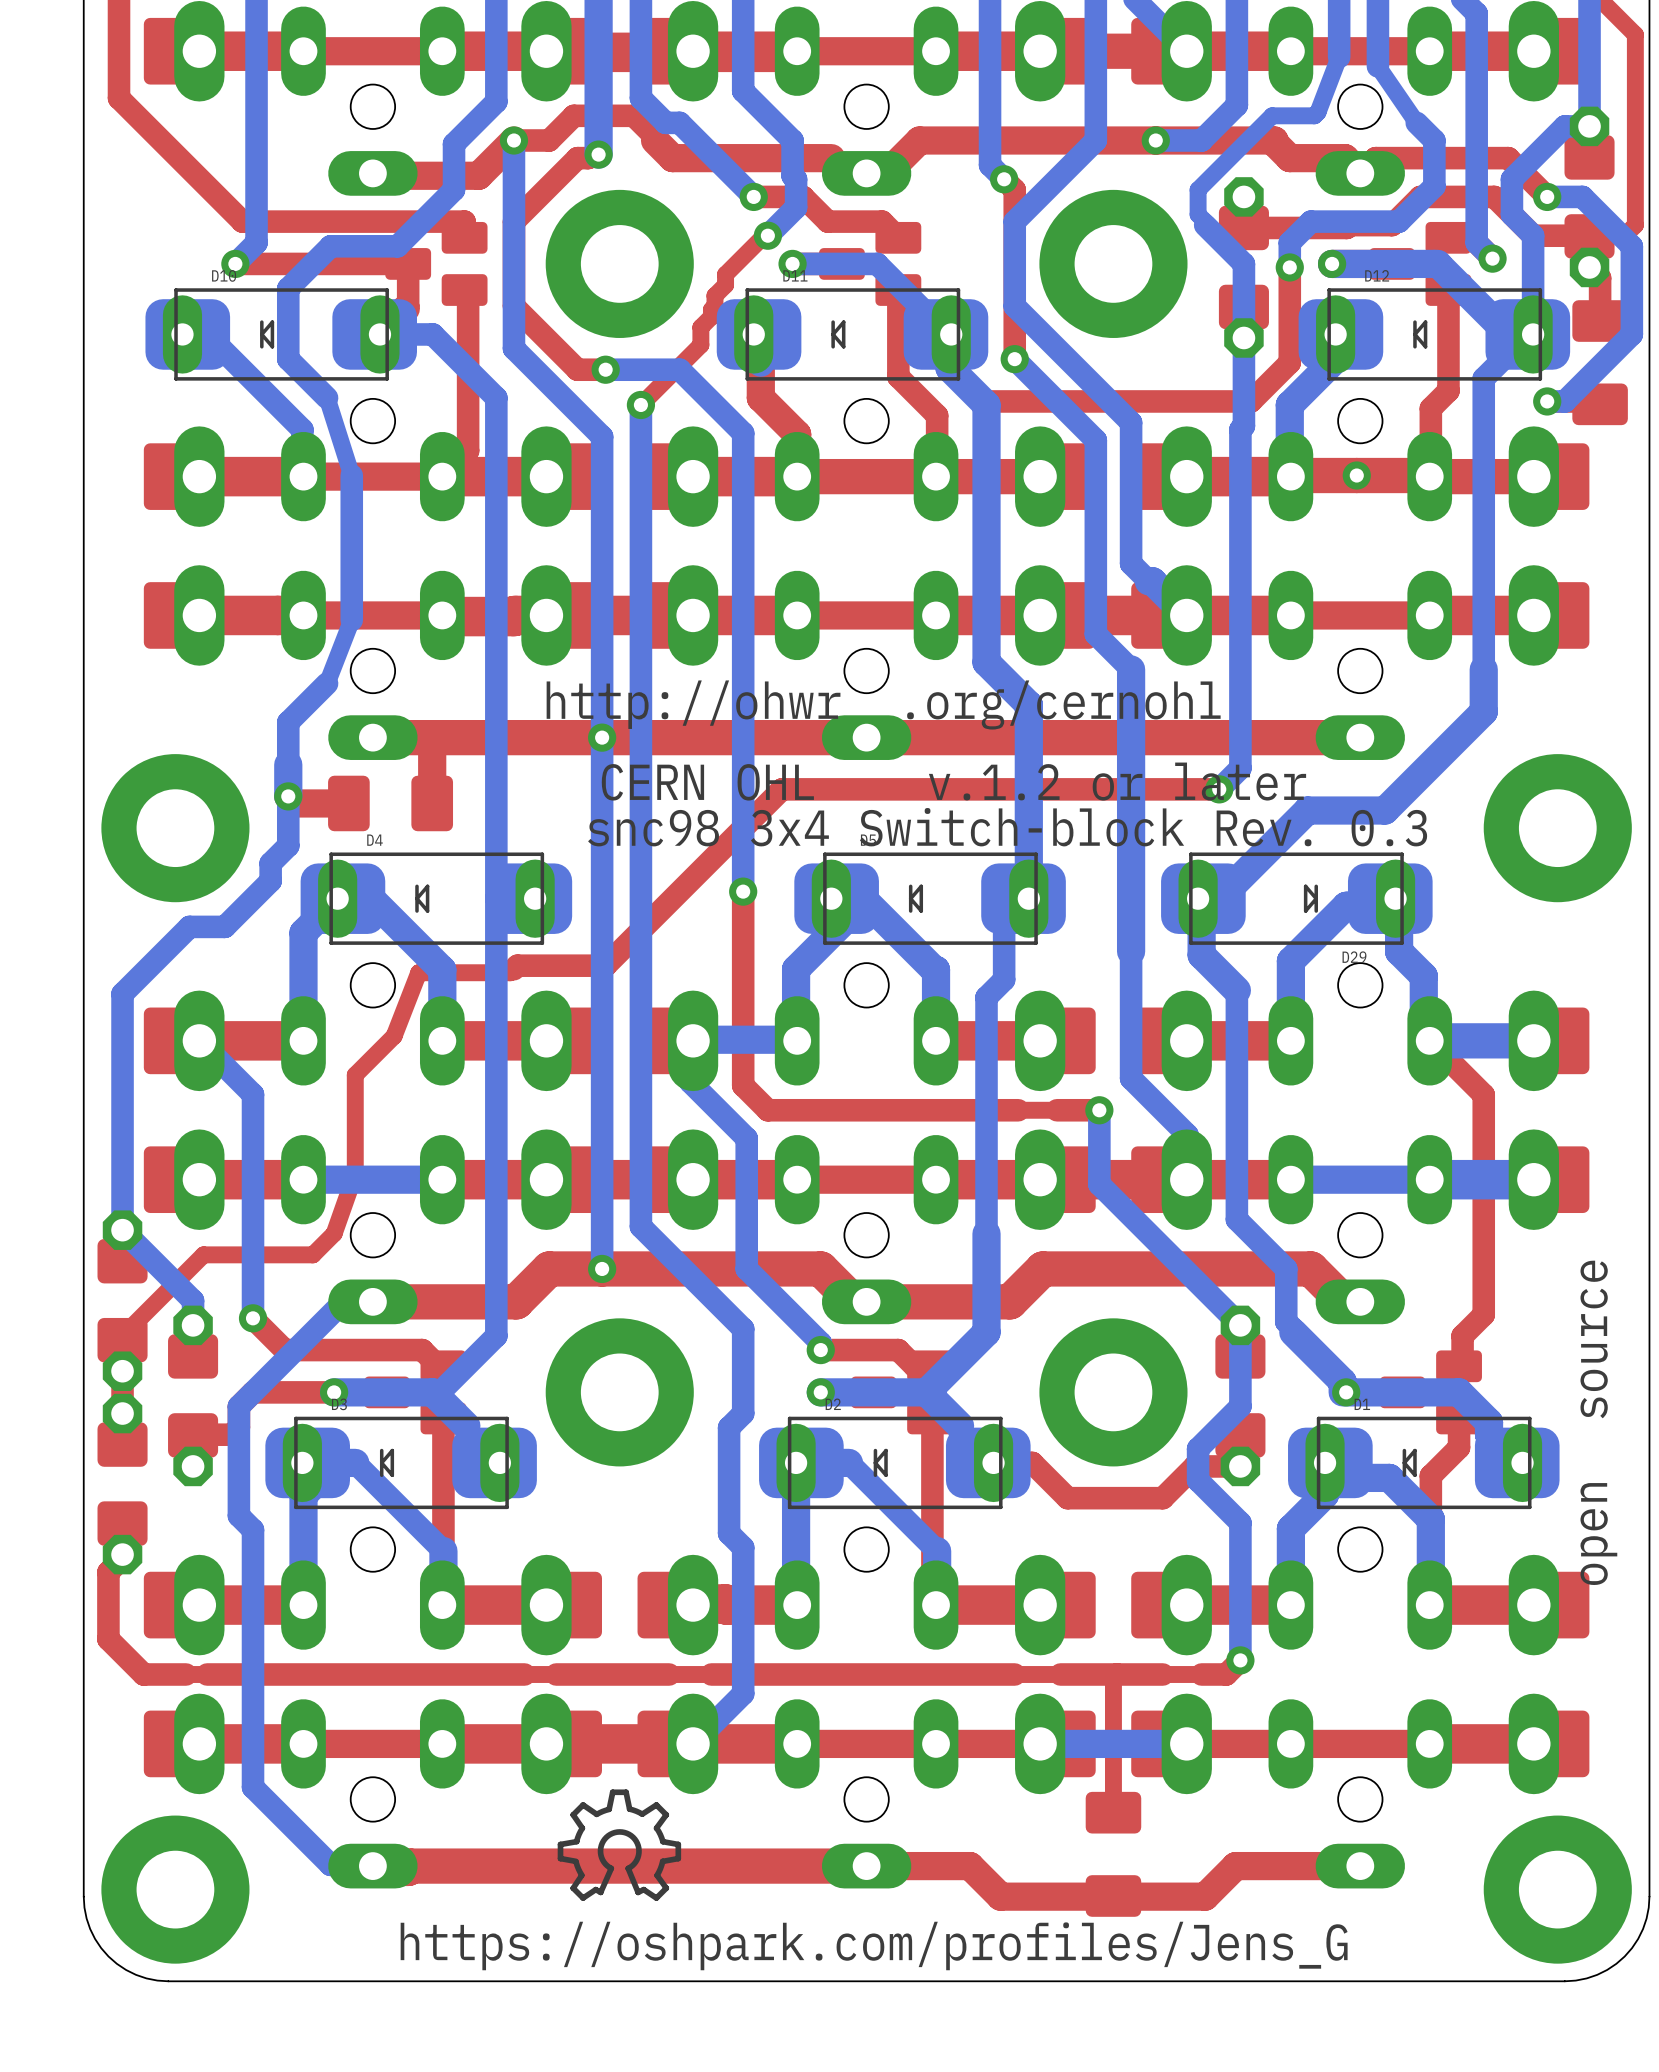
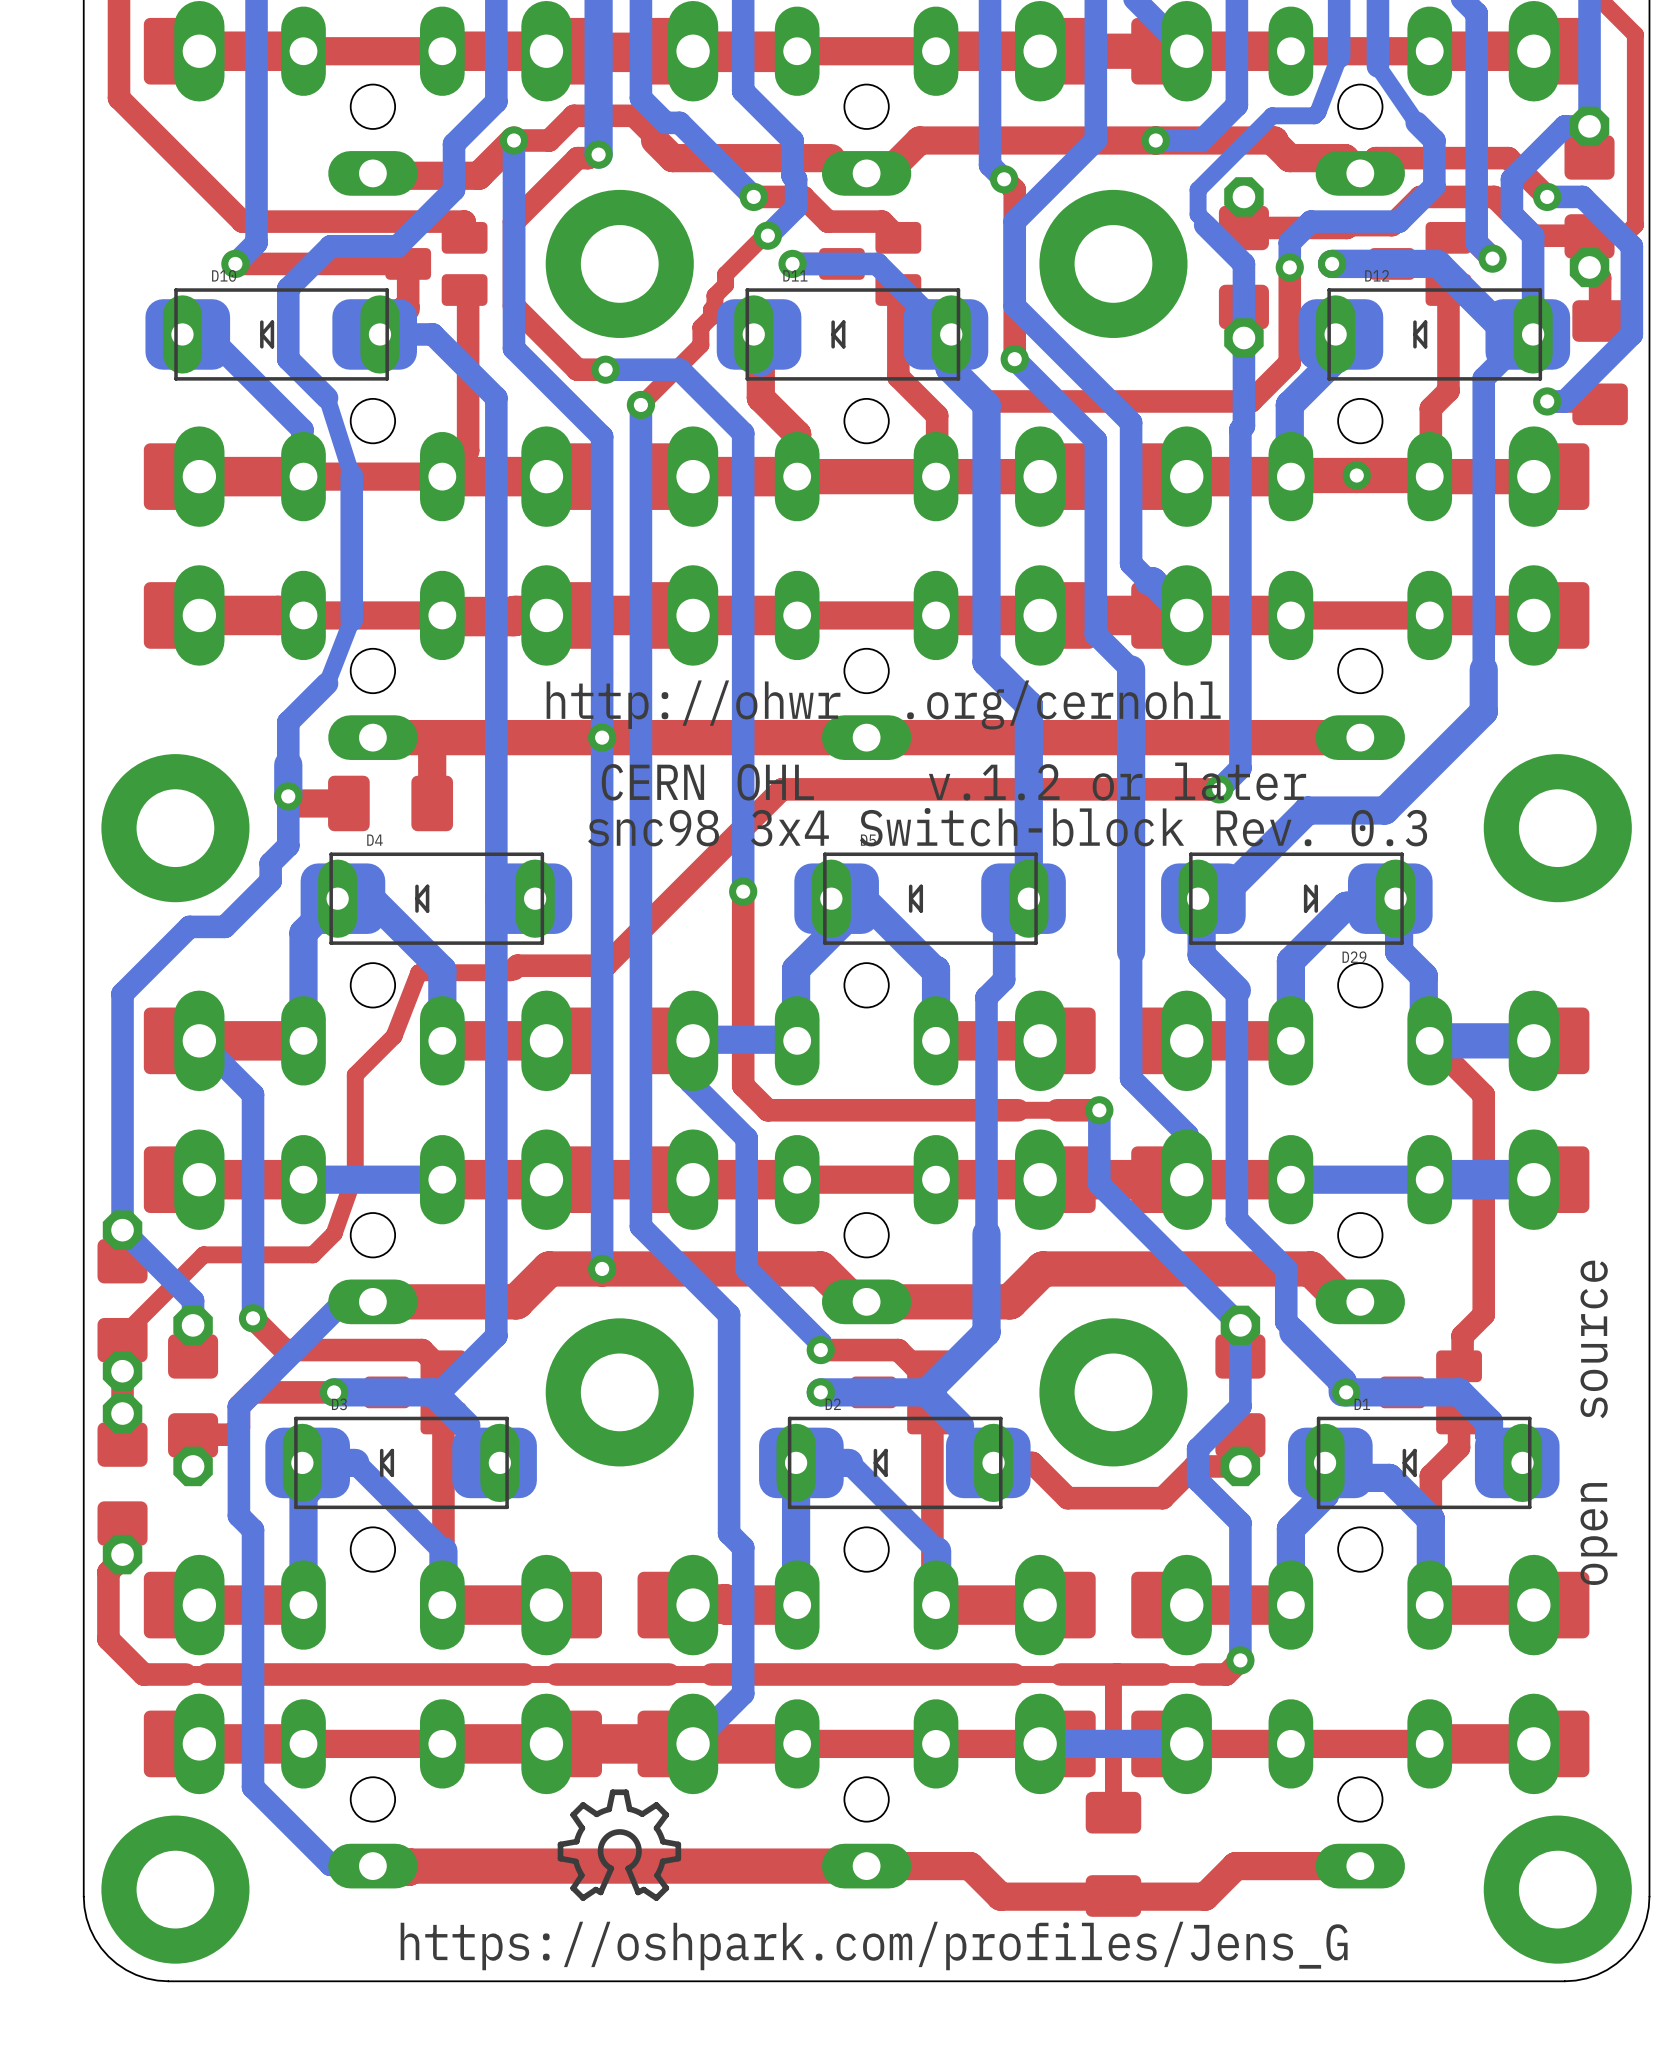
bottom track: (729, 1314) (743, 1328) (743, 1413) (729, 1427) -> (729, 1314) (729, 1427)

